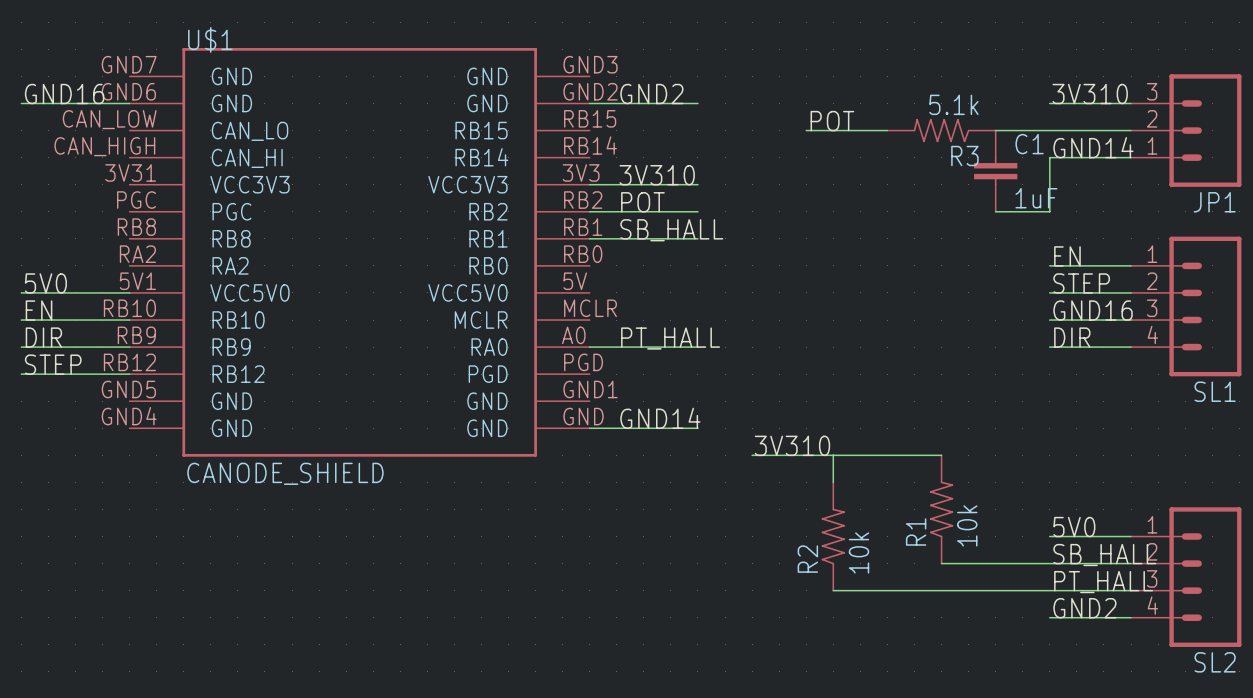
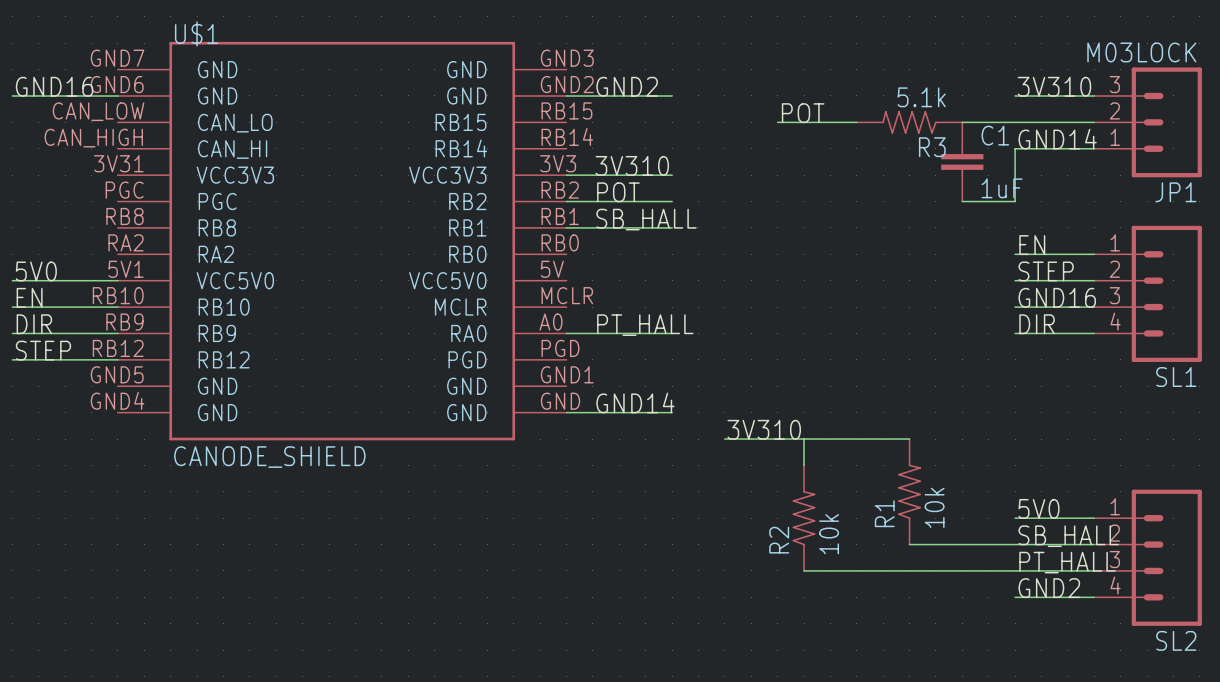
JP1 value: none -> M03LOCK (1141, 52)

